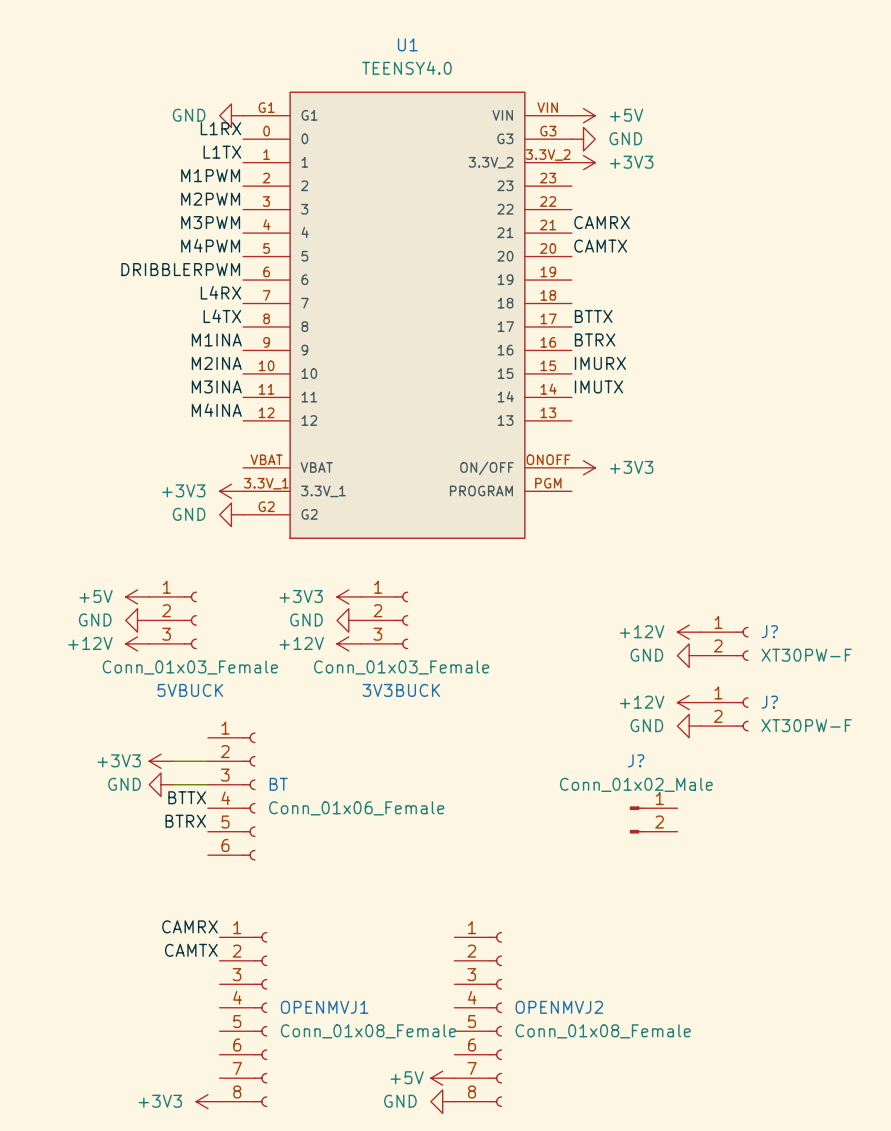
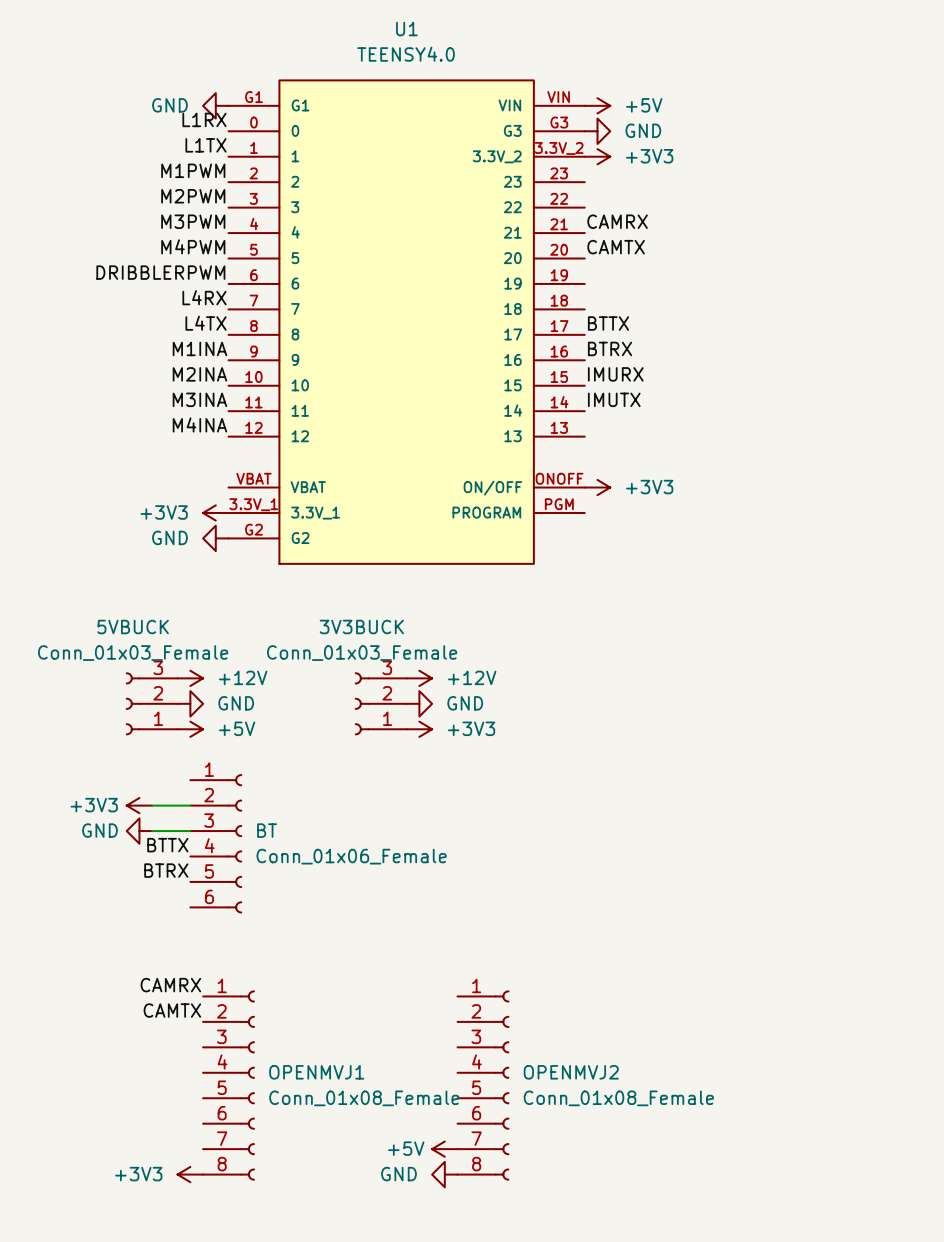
power symbol rotation: 0° (137, 596) -> 180° (190, 729)
power symbol position: +5V (137, 596) -> +5V (190, 729)
power symbol rotation: 0° (348, 596) -> 180° (419, 729)
power symbol position: +3V3 (348, 596) -> +3V3 (419, 729)
power symbol: GND (137, 620) -> none
5VBUCK position: (173, 620) -> (151, 703)
5VBUCK rotation: 0° (190, 620) -> 180° (133, 703)
power symbol: GND (348, 620) -> none
3V3BUCK position: (384, 620) -> (380, 703)
3V3BUCK rotation: 0° (401, 620) -> 180° (362, 703)
power symbol: +12V (689, 632) -> none
power symbol: +12V (137, 643) -> none
power symbol: none -> +12V (190, 678)
power symbol: +12V (348, 643) -> none
power symbol: none -> +12V (419, 678)
J?: XT30PW-F (724, 643) -> none
power symbol: GND (689, 655) -> none
power symbol: none -> GND (190, 703)
power symbol: none -> GND (419, 703)
power symbol: +12V (689, 702) -> none
J?: XT30PW-F (724, 714) -> none
power symbol: GND (689, 726) -> none
J?: Conn_01x02_Male (653, 819) -> none

